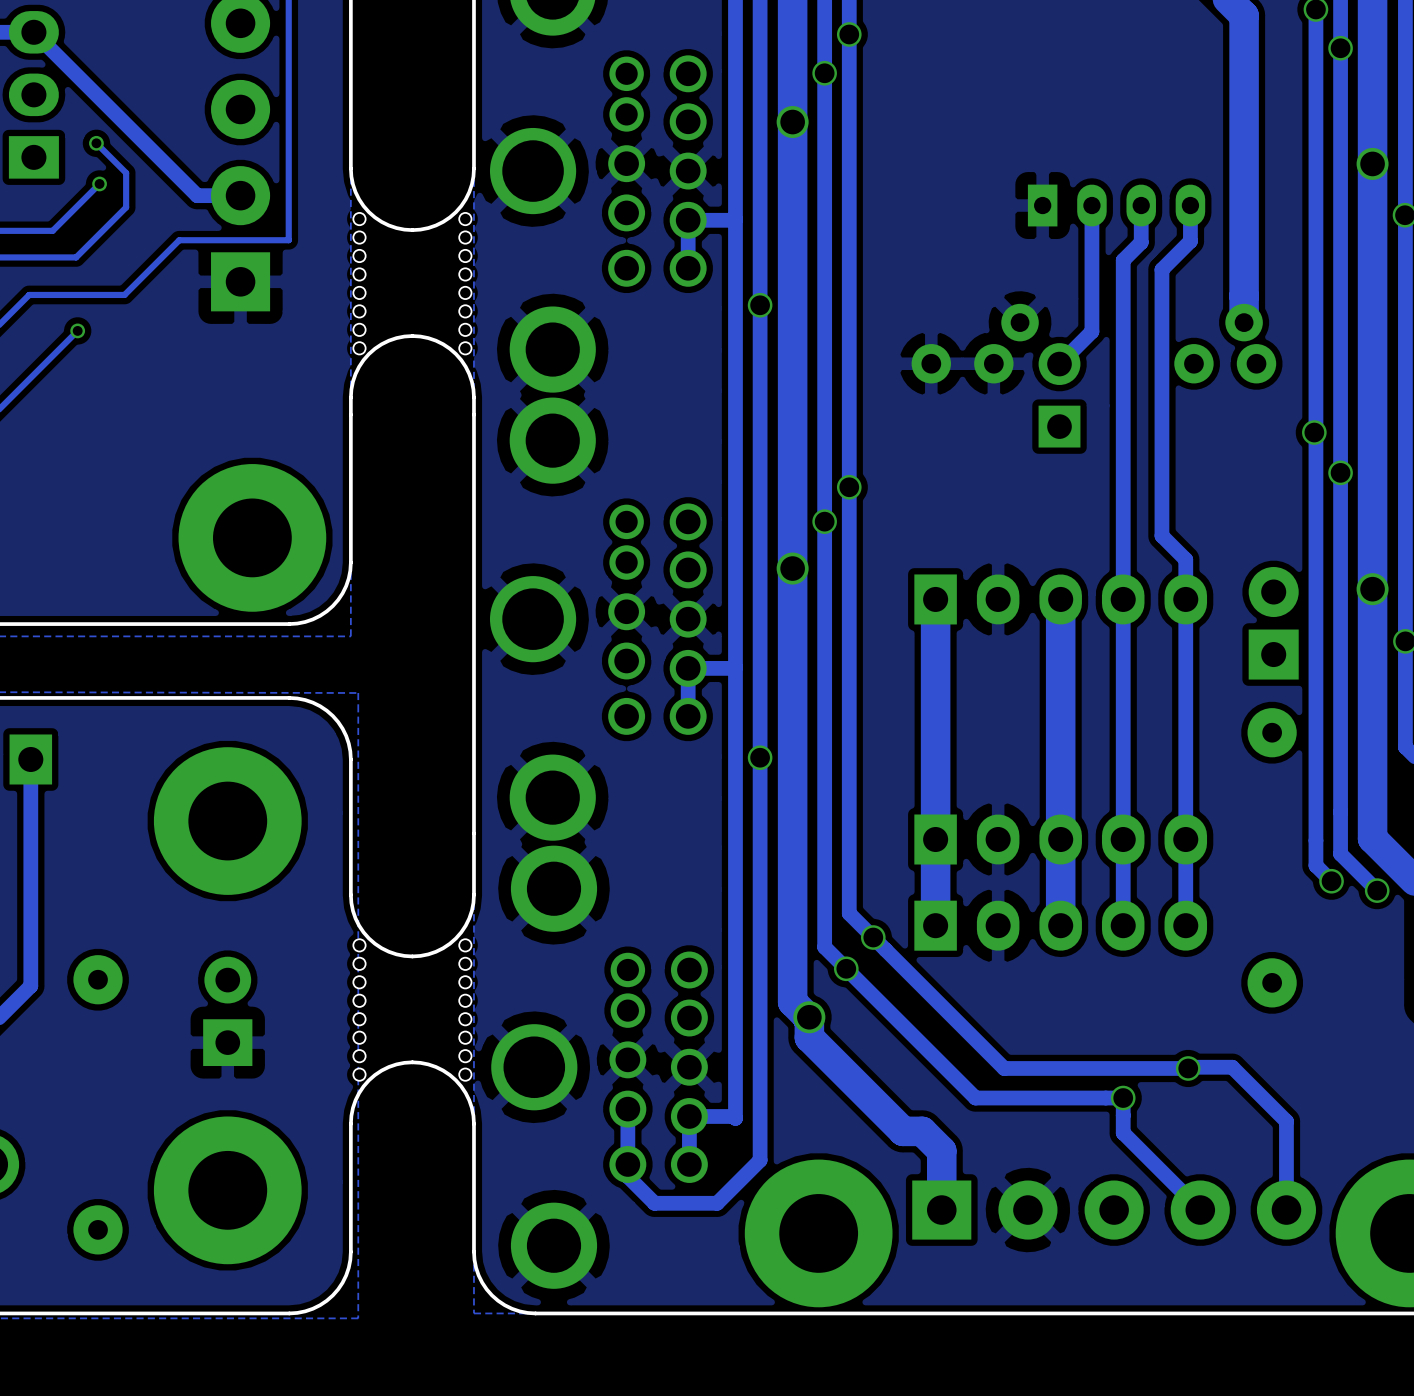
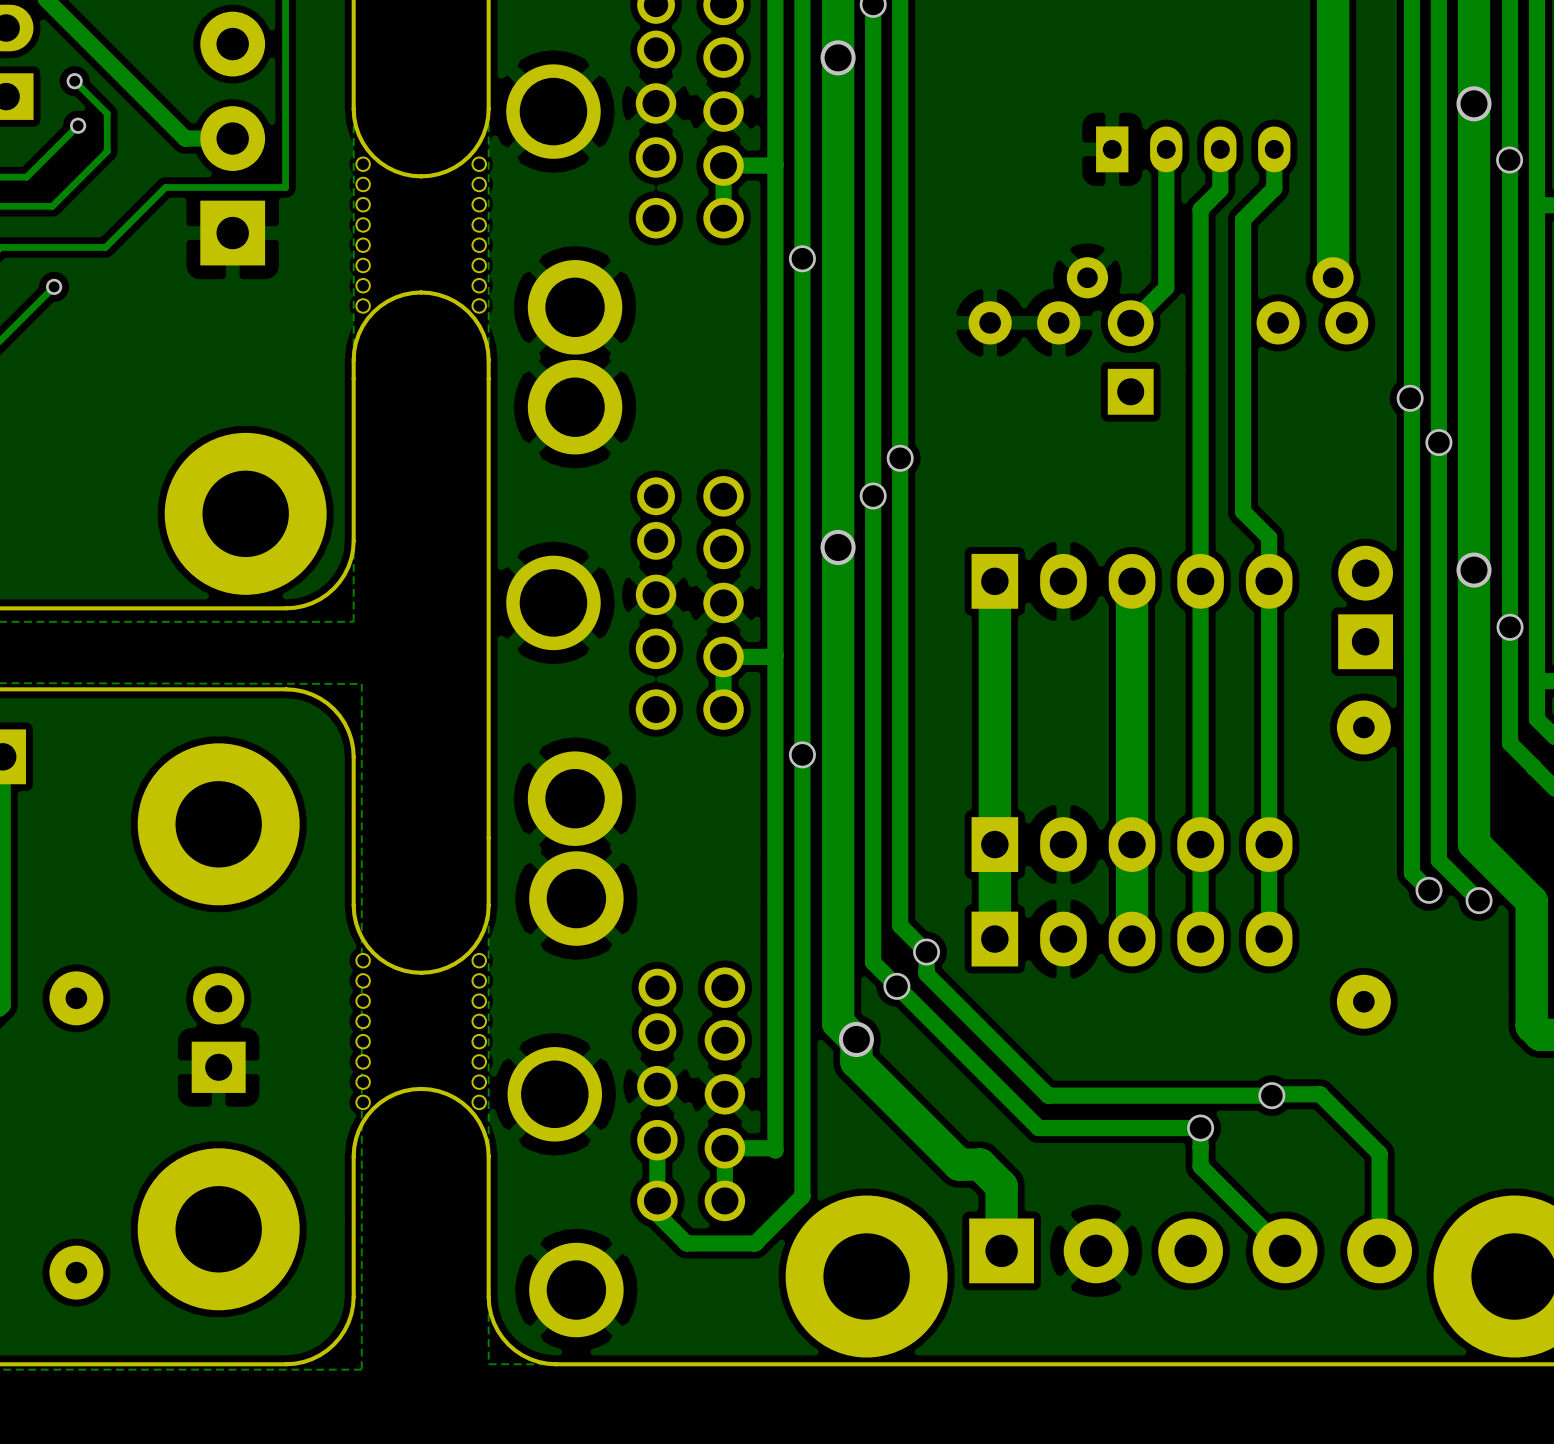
track: (873, 937) (1004, 1068) -> (926, 952) (926, 974) (1048, 1095) (1070, 1095)

